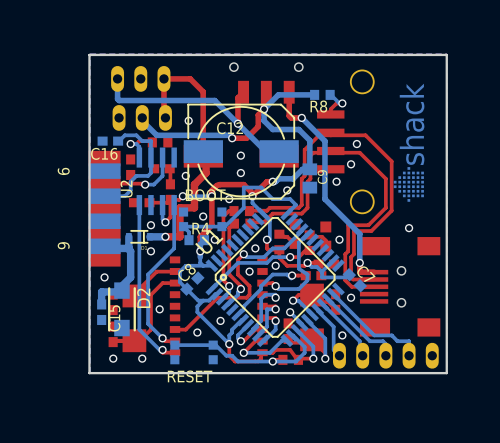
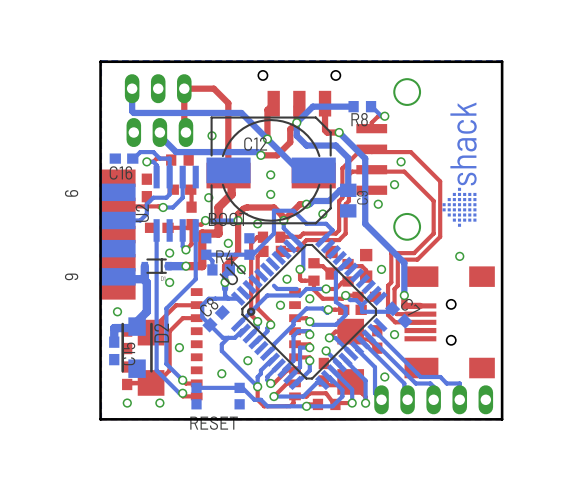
bottom track: (302, 229) (284, 248) (272, 248) (264, 257) -> none
top track: (243, 254) (237, 260) (237, 274) (249, 286) (249, 294) (246, 297) (217, 297) (185, 329) (175, 329) -> none
via: (243, 254) -> none

